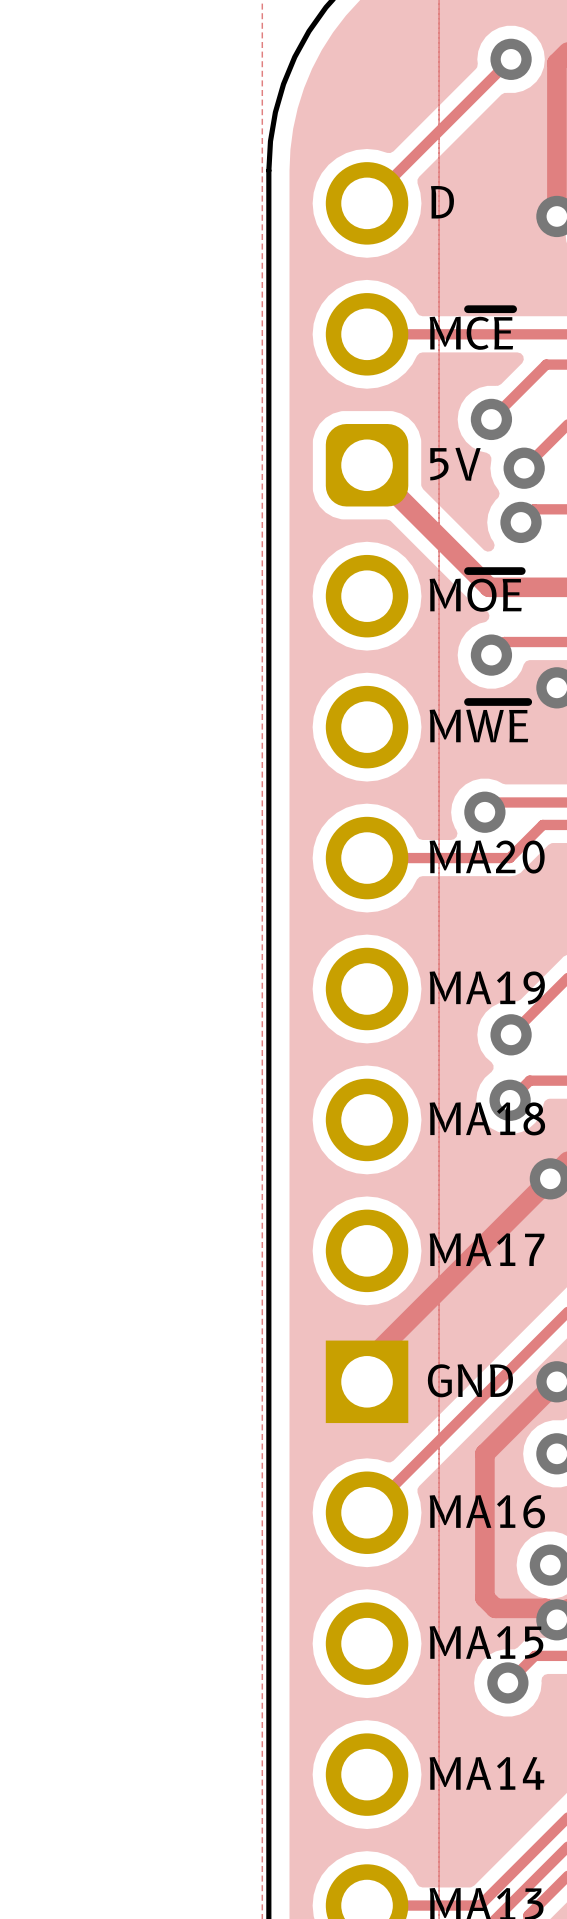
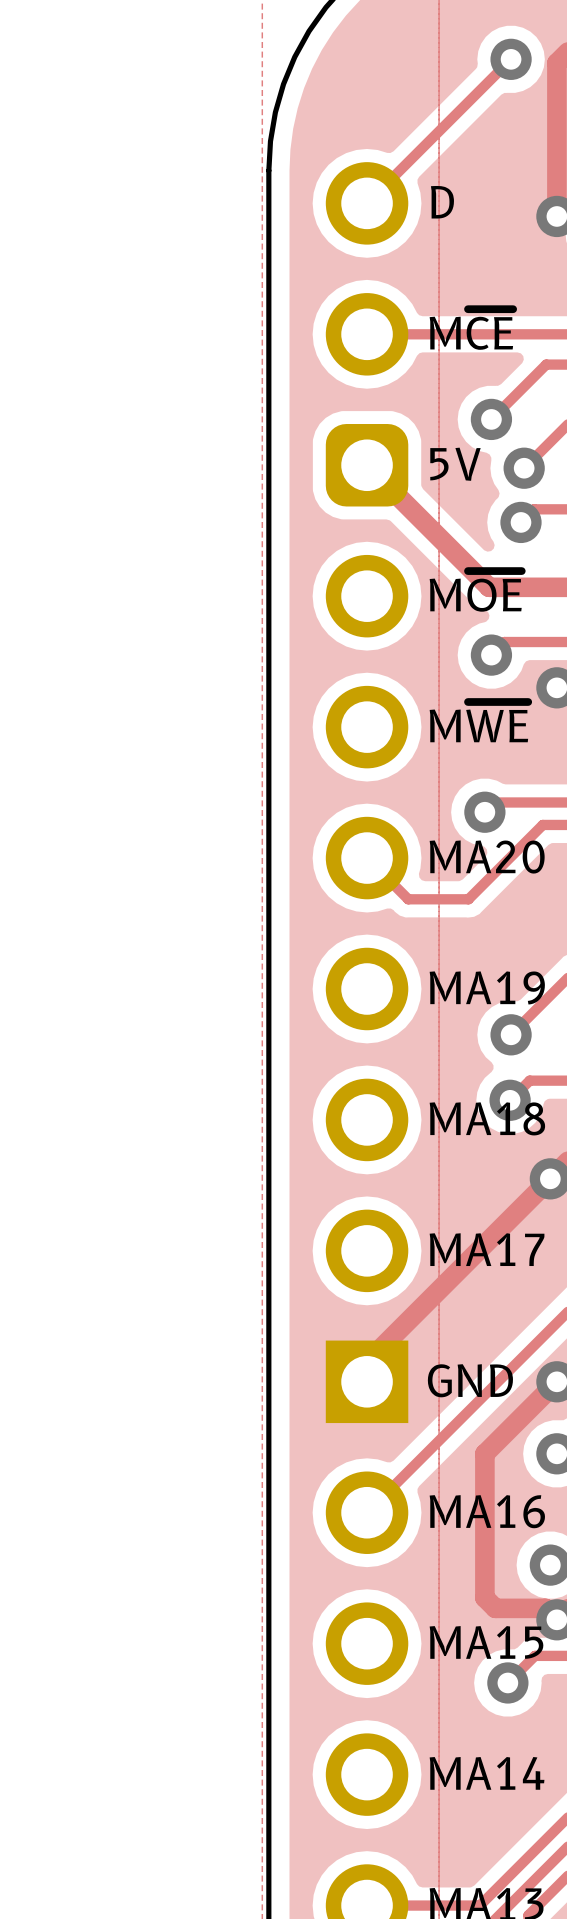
track: (367, 858) (509, 858) -> (367, 858) (408, 899) (468, 899) (509, 858)

